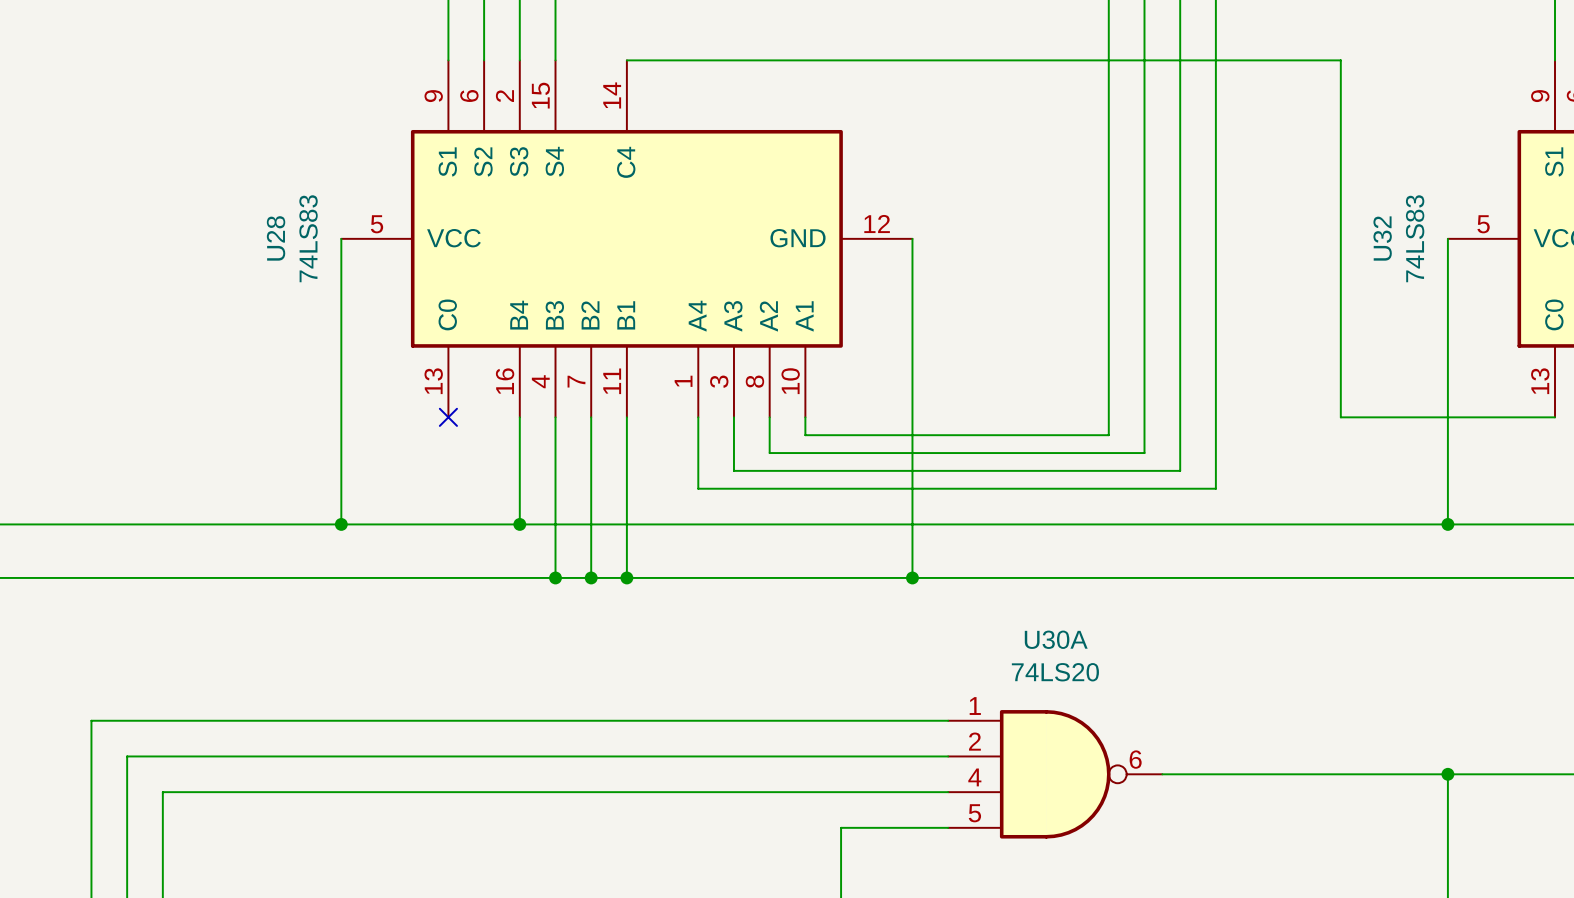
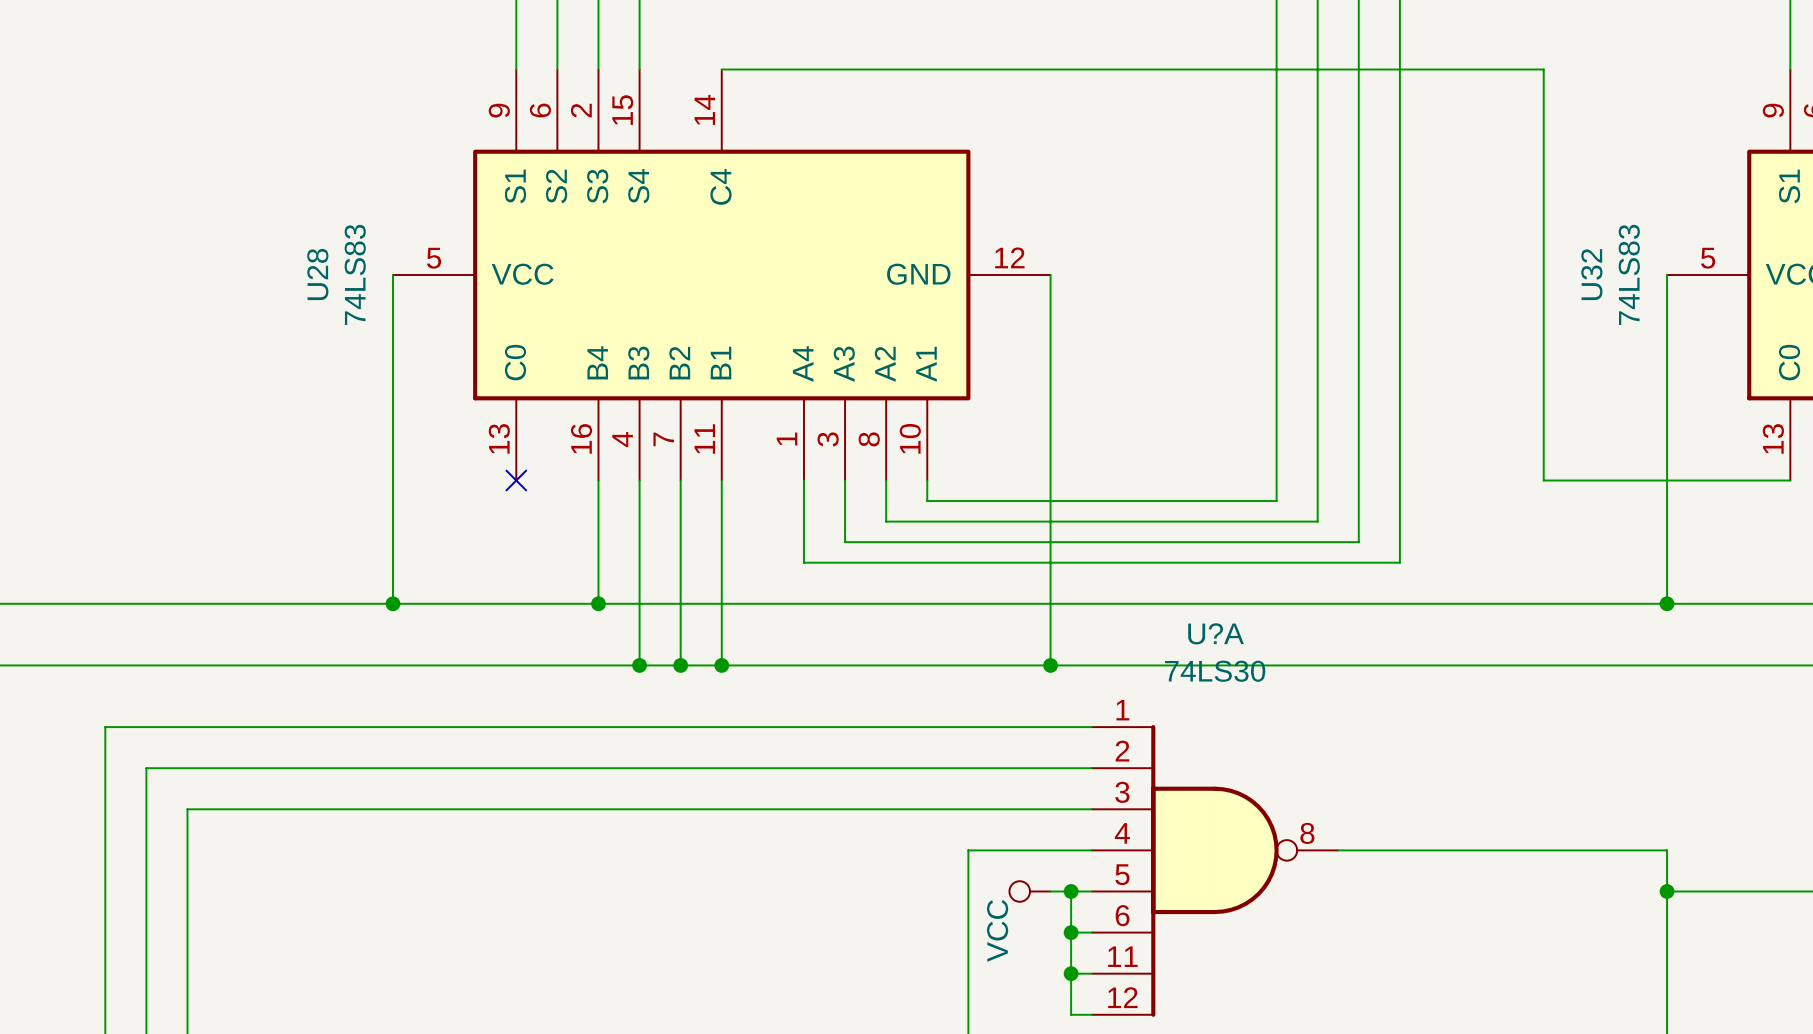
wire: (91, 720) (948, 720) -> (105, 829) (105, 727) (1091, 727)
wire: (127, 756) (948, 756) -> (146, 870) (146, 768) (1091, 768)
U?A: none -> 74LS30 (1214, 870)
power symbol: none -> VCC (1030, 891)
wire: none -> (1050, 891) (1091, 891)
wire: none -> (1071, 891) (1071, 1014) (1091, 1014)
junction: none -> (1071, 891)
U30A: 74LS20 (1055, 774) -> none
wire: (1162, 774) (1447, 774) -> (1338, 850) (1667, 850) (1667, 891)
wire: (162, 792) (948, 792) -> (187, 912) (187, 809) (1091, 809)
wire: none -> (1071, 932) (1091, 932)
junction: none -> (1071, 932)
wire: (841, 827) (948, 827) -> (968, 953) (968, 850) (1091, 850)
wire: none -> (1071, 973) (1091, 973)
junction: none -> (1071, 973)

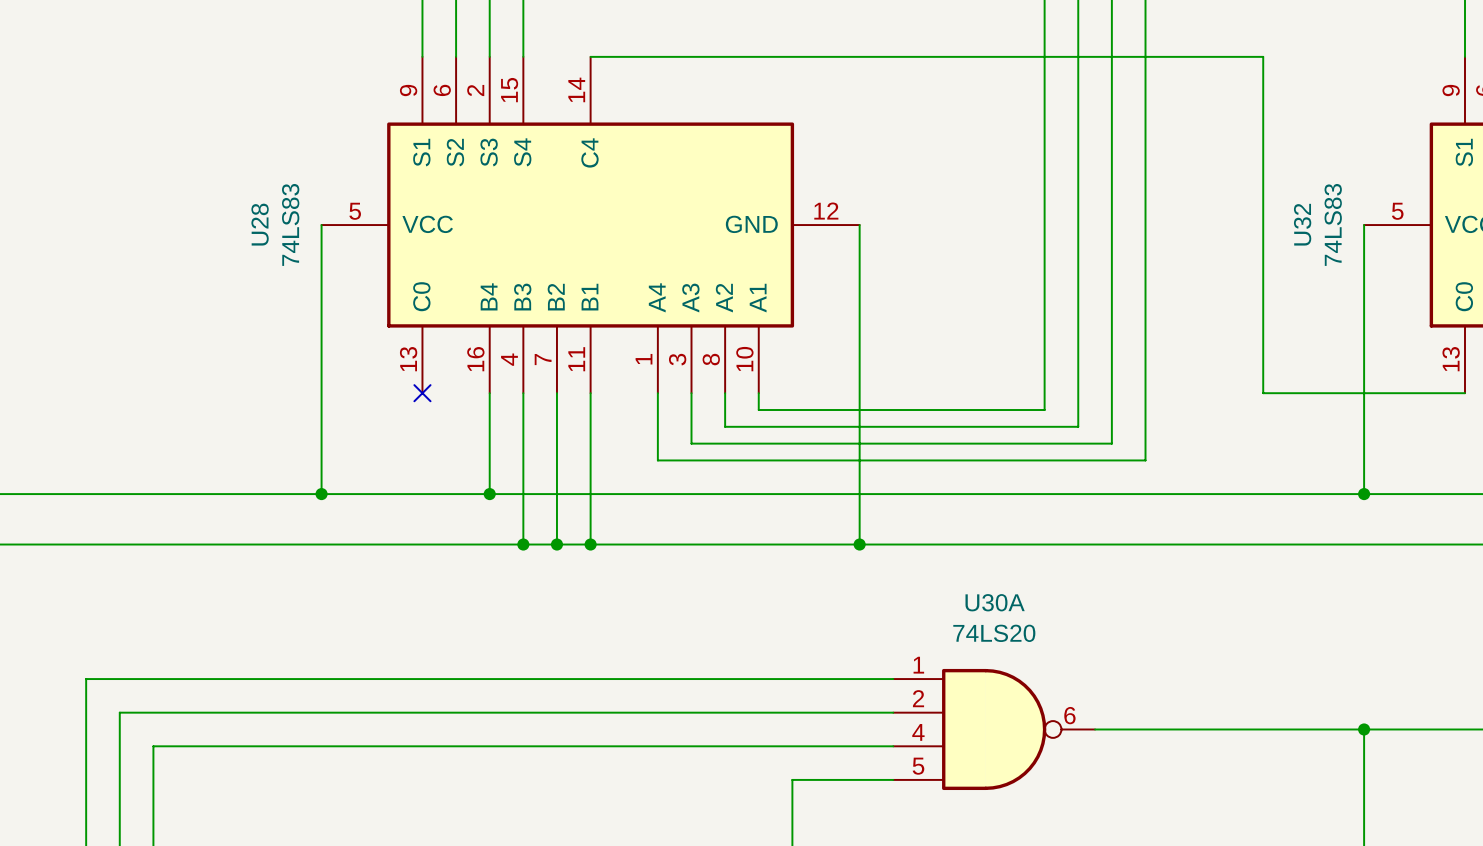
wire: (1091, 727) (105, 727) (105, 829) -> (893, 679) (86, 679)
wire: (1091, 768) (146, 768) (146, 870) -> (893, 712) (119, 712)
wire: (1091, 809) (187, 809) (187, 912) -> (893, 746) (153, 746)
wire: (1091, 850) (968, 850) (968, 953) -> (893, 779) (792, 779)
wire: (1338, 850) (1667, 850) (1667, 891) -> (1095, 729) (1364, 729)
U?A: 74LS30 (1214, 870) -> none
power symbol: VCC (1030, 891) -> none
wire: (1050, 891) (1091, 891) -> none
wire: (1071, 891) (1071, 1014) (1091, 1014) -> none
junction: (1071, 891) -> none
U30A: none -> 74LS20 (994, 729)
wire: (1071, 932) (1091, 932) -> none
junction: (1071, 932) -> none
wire: (1071, 973) (1091, 973) -> none
junction: (1071, 973) -> none

